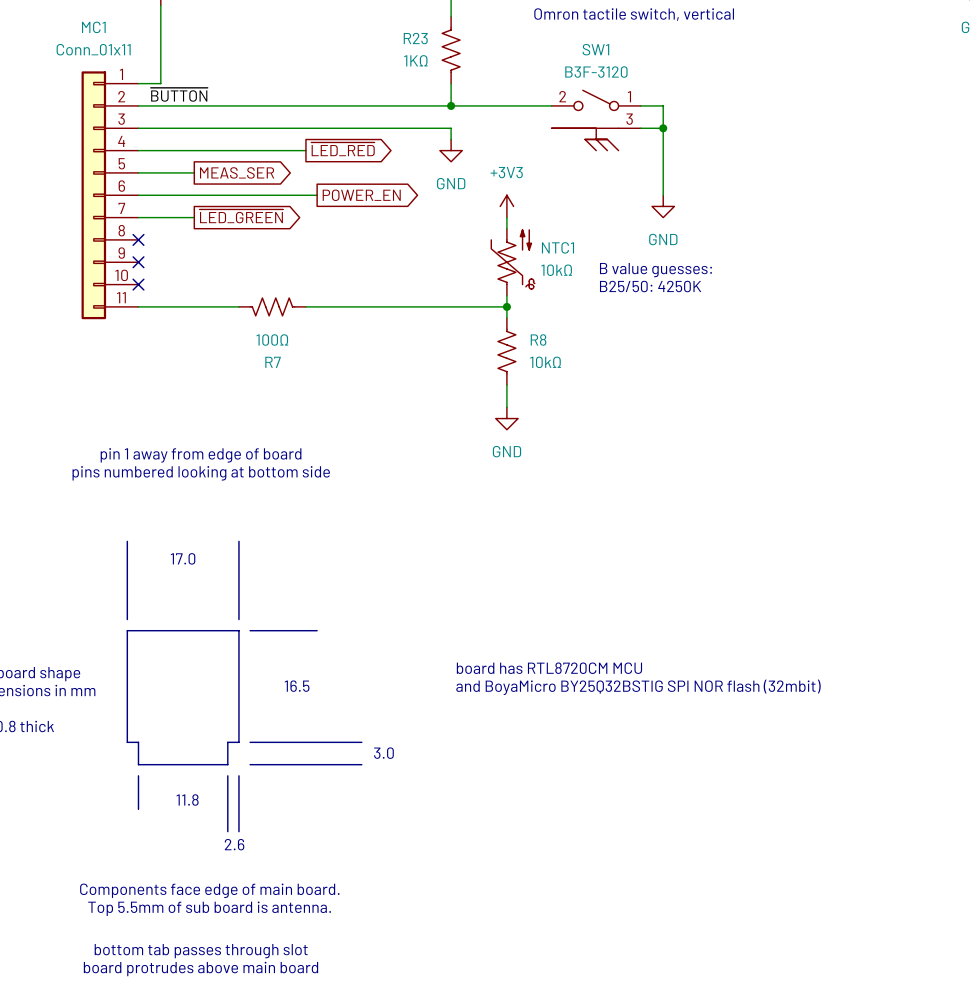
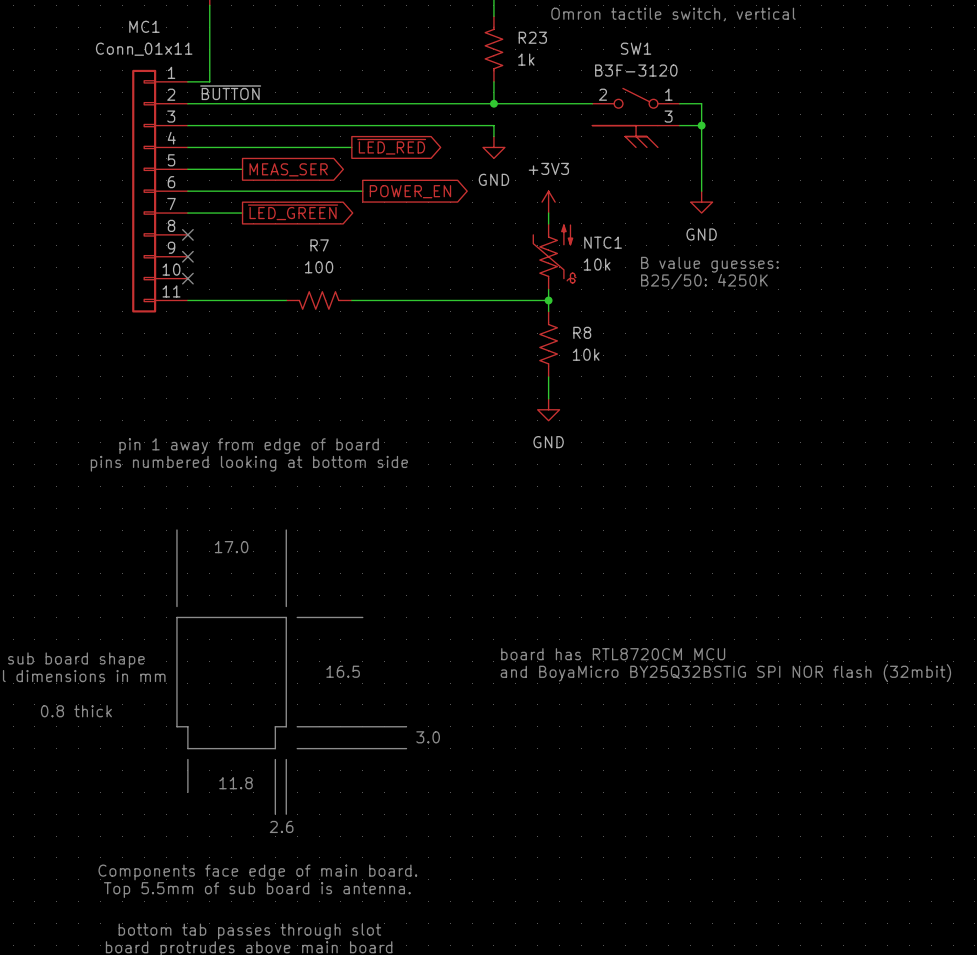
R23 name position: R23 (415, 38) -> R23 (532, 37)
R23 value: 1KΩ (415, 60) -> 1k (526, 59)
NTC1 value: 10kΩ (556, 270) -> 10k (597, 264)
R7 value: 100Ω (272, 340) -> 100 (319, 267)
R7 name position: R7 (273, 362) -> R7 (319, 245)
R8 value: 10kΩ (545, 362) -> 10k (586, 354)

